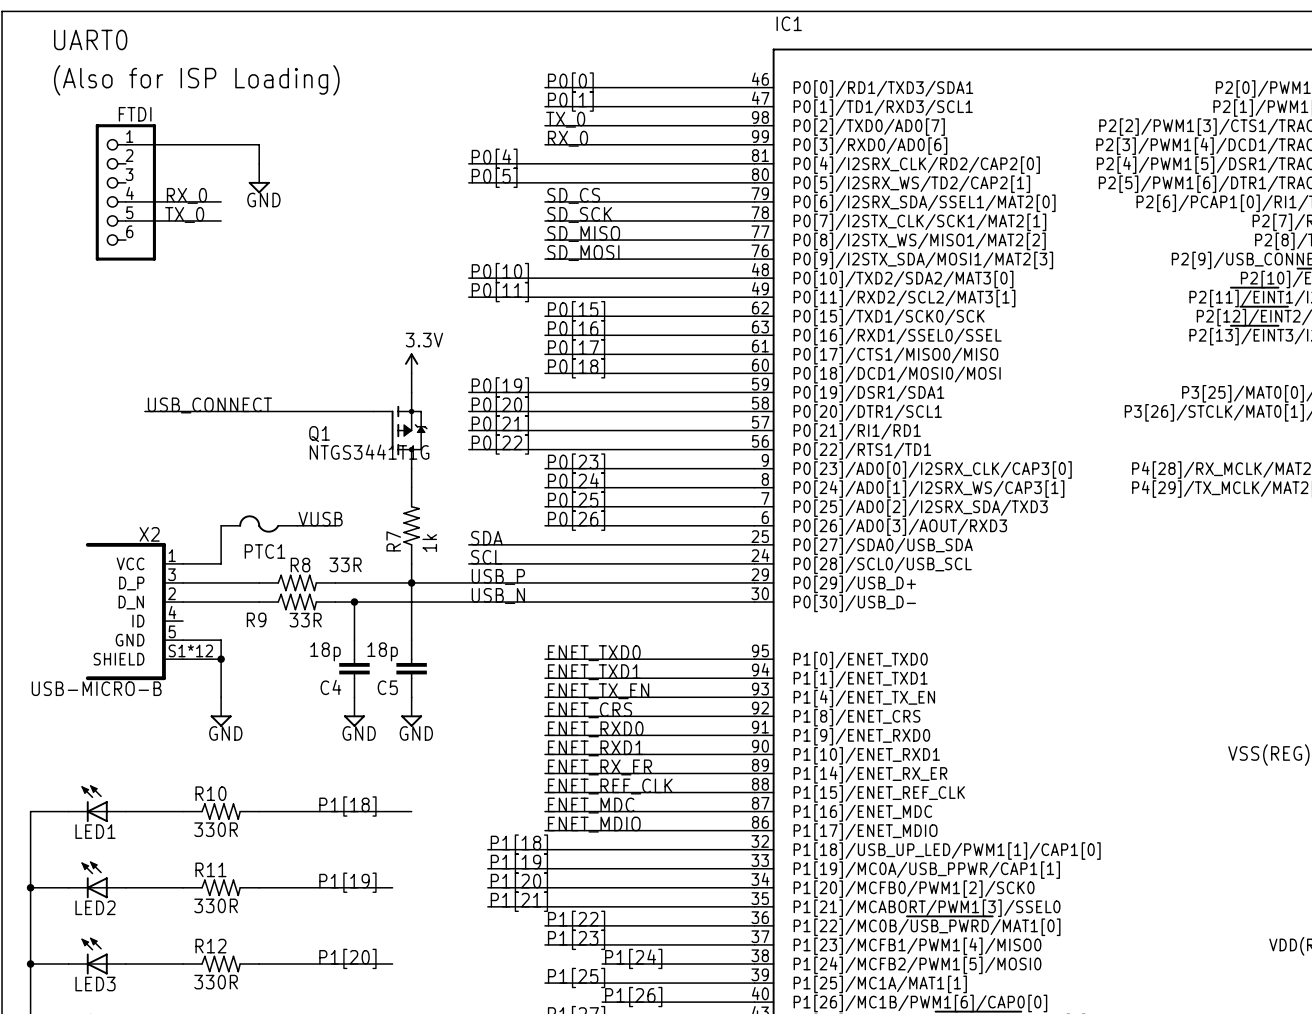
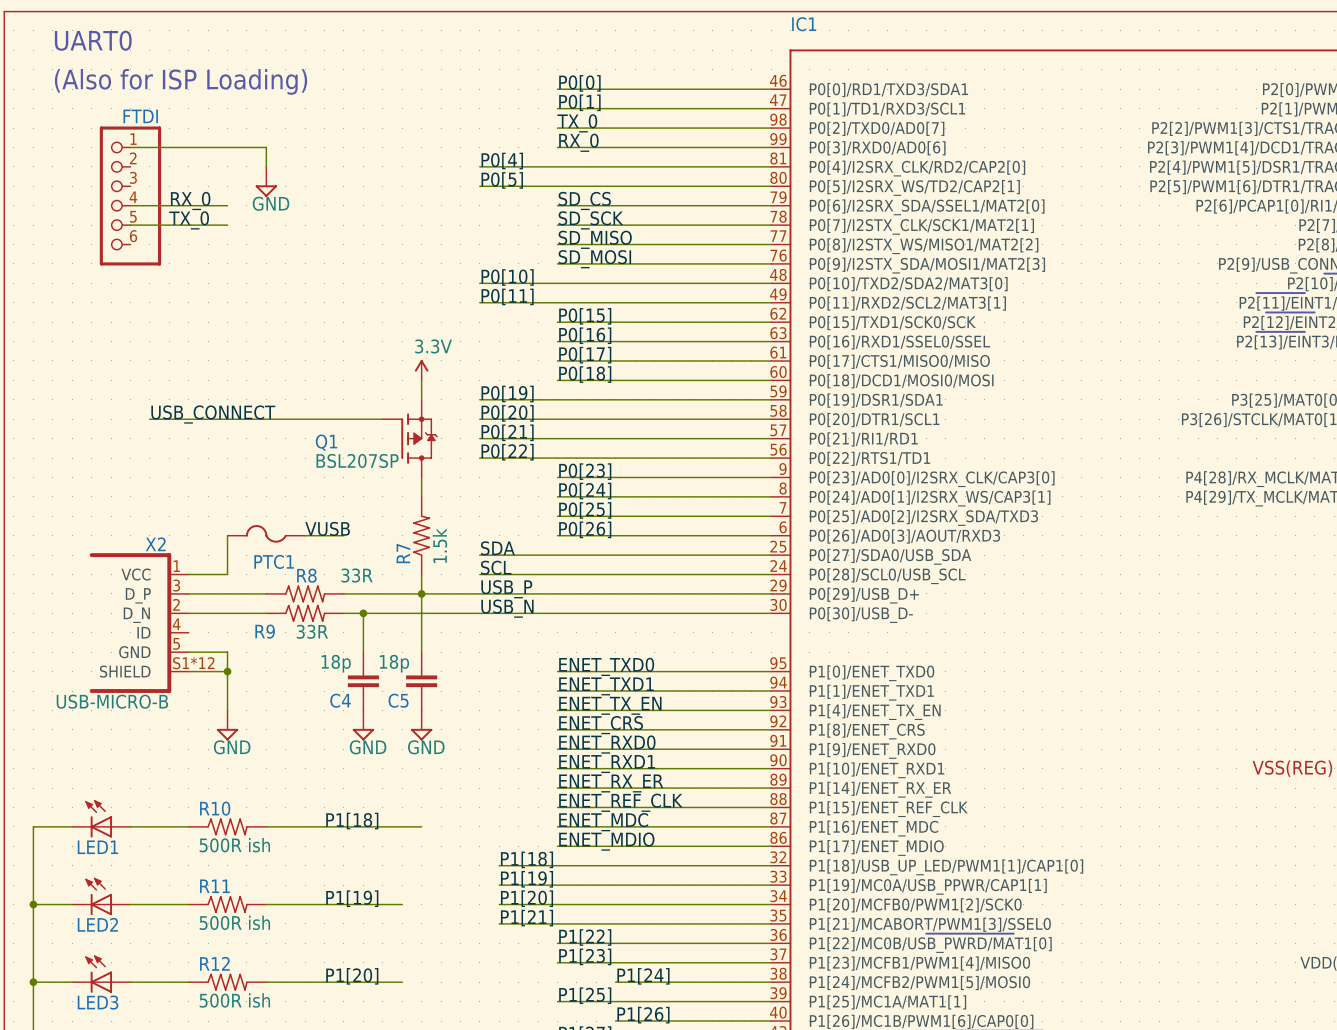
Q1 value: NTGS3441T1G (369, 452) -> BSL207SP (357, 460)
R7 value: 1k (429, 543) -> 1.5k (439, 545)
R10 value: 330R (216, 829) -> 500R ish (234, 845)
R11 value: 330R (216, 905) -> 500R ish (234, 922)
R12 value: 330R (216, 982) -> 500R ish (234, 1000)

